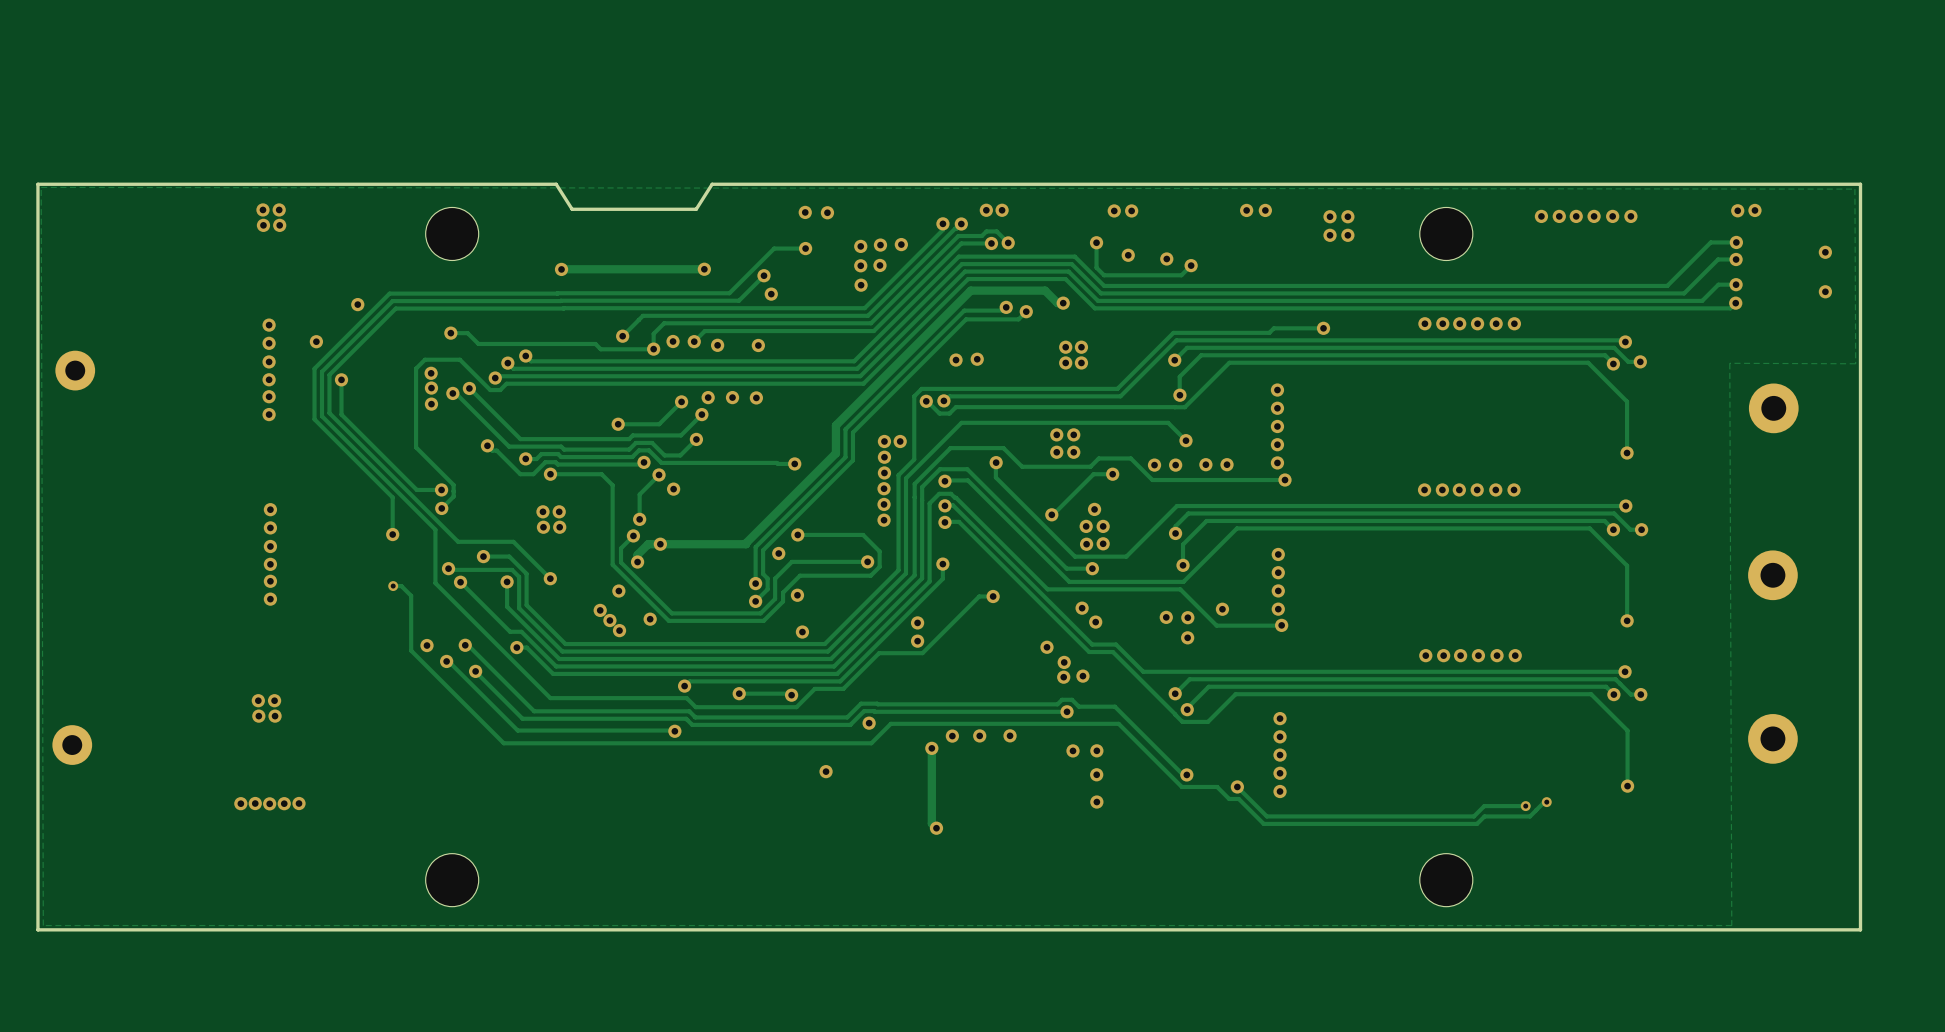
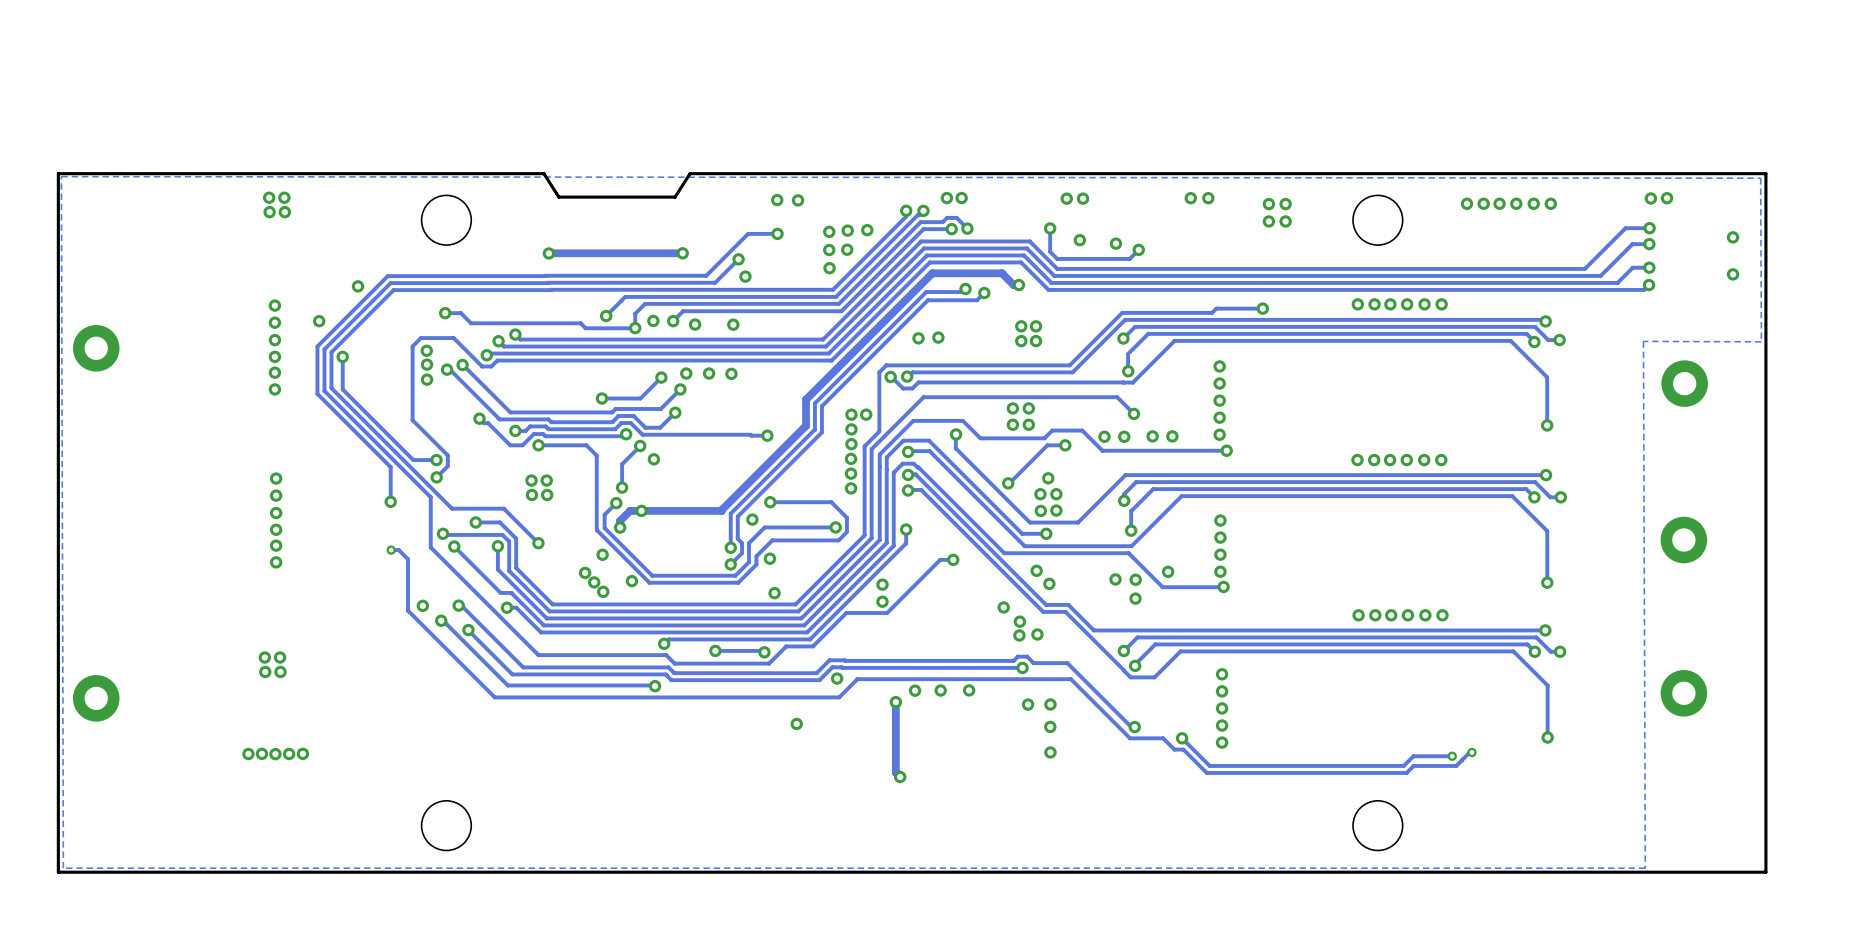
part footprint: [55, 350, 96, 391] -> [72, 325, 120, 372]
part footprint: [52, 725, 93, 765] -> [72, 675, 120, 722]

